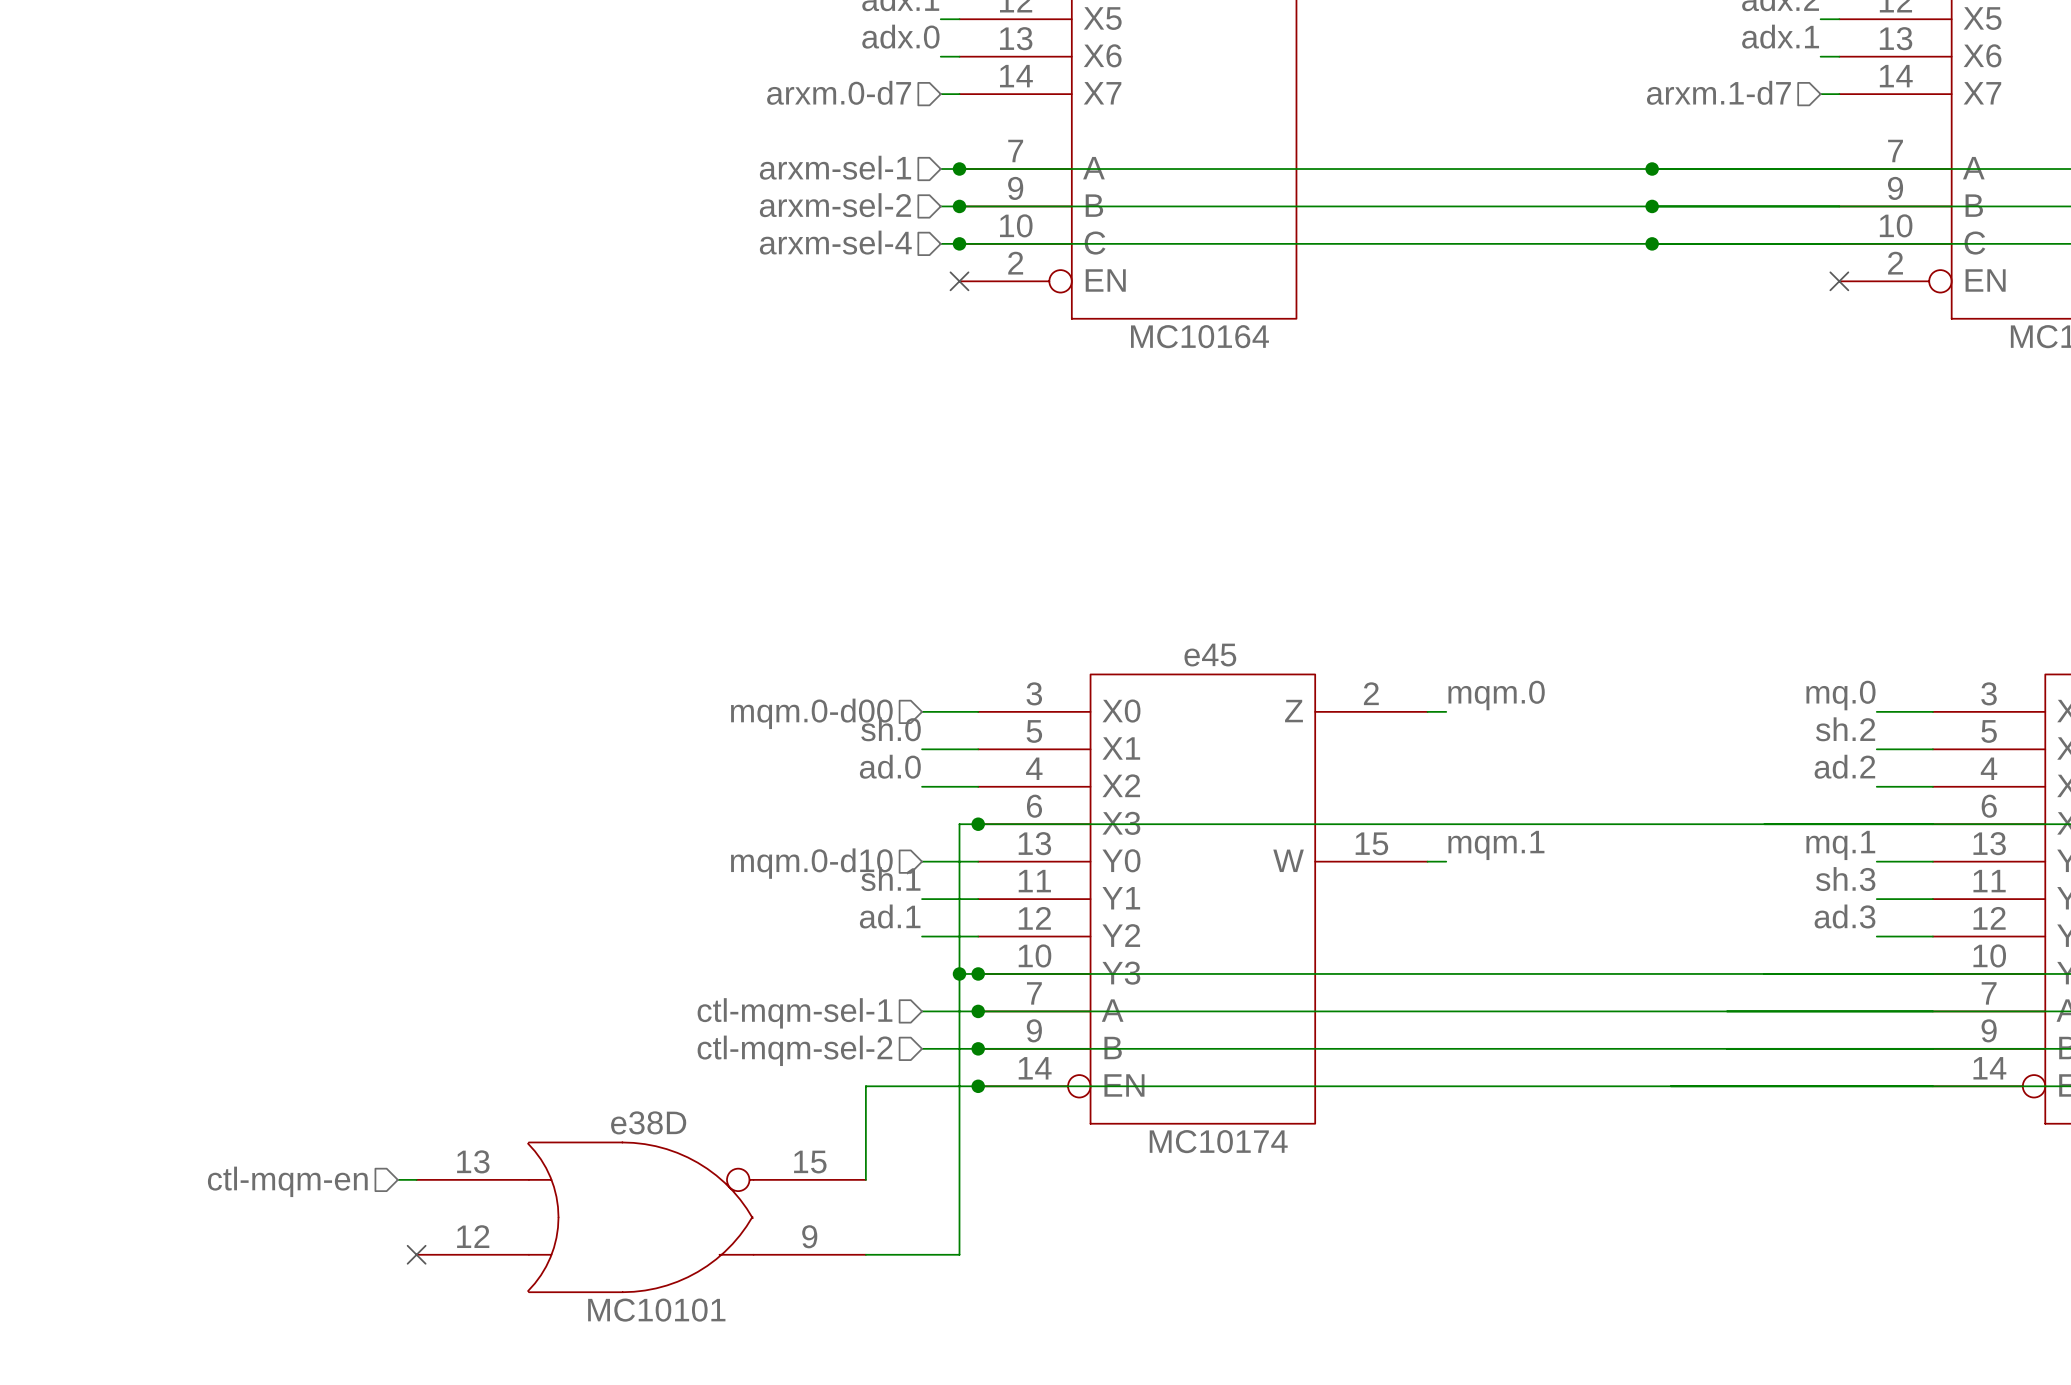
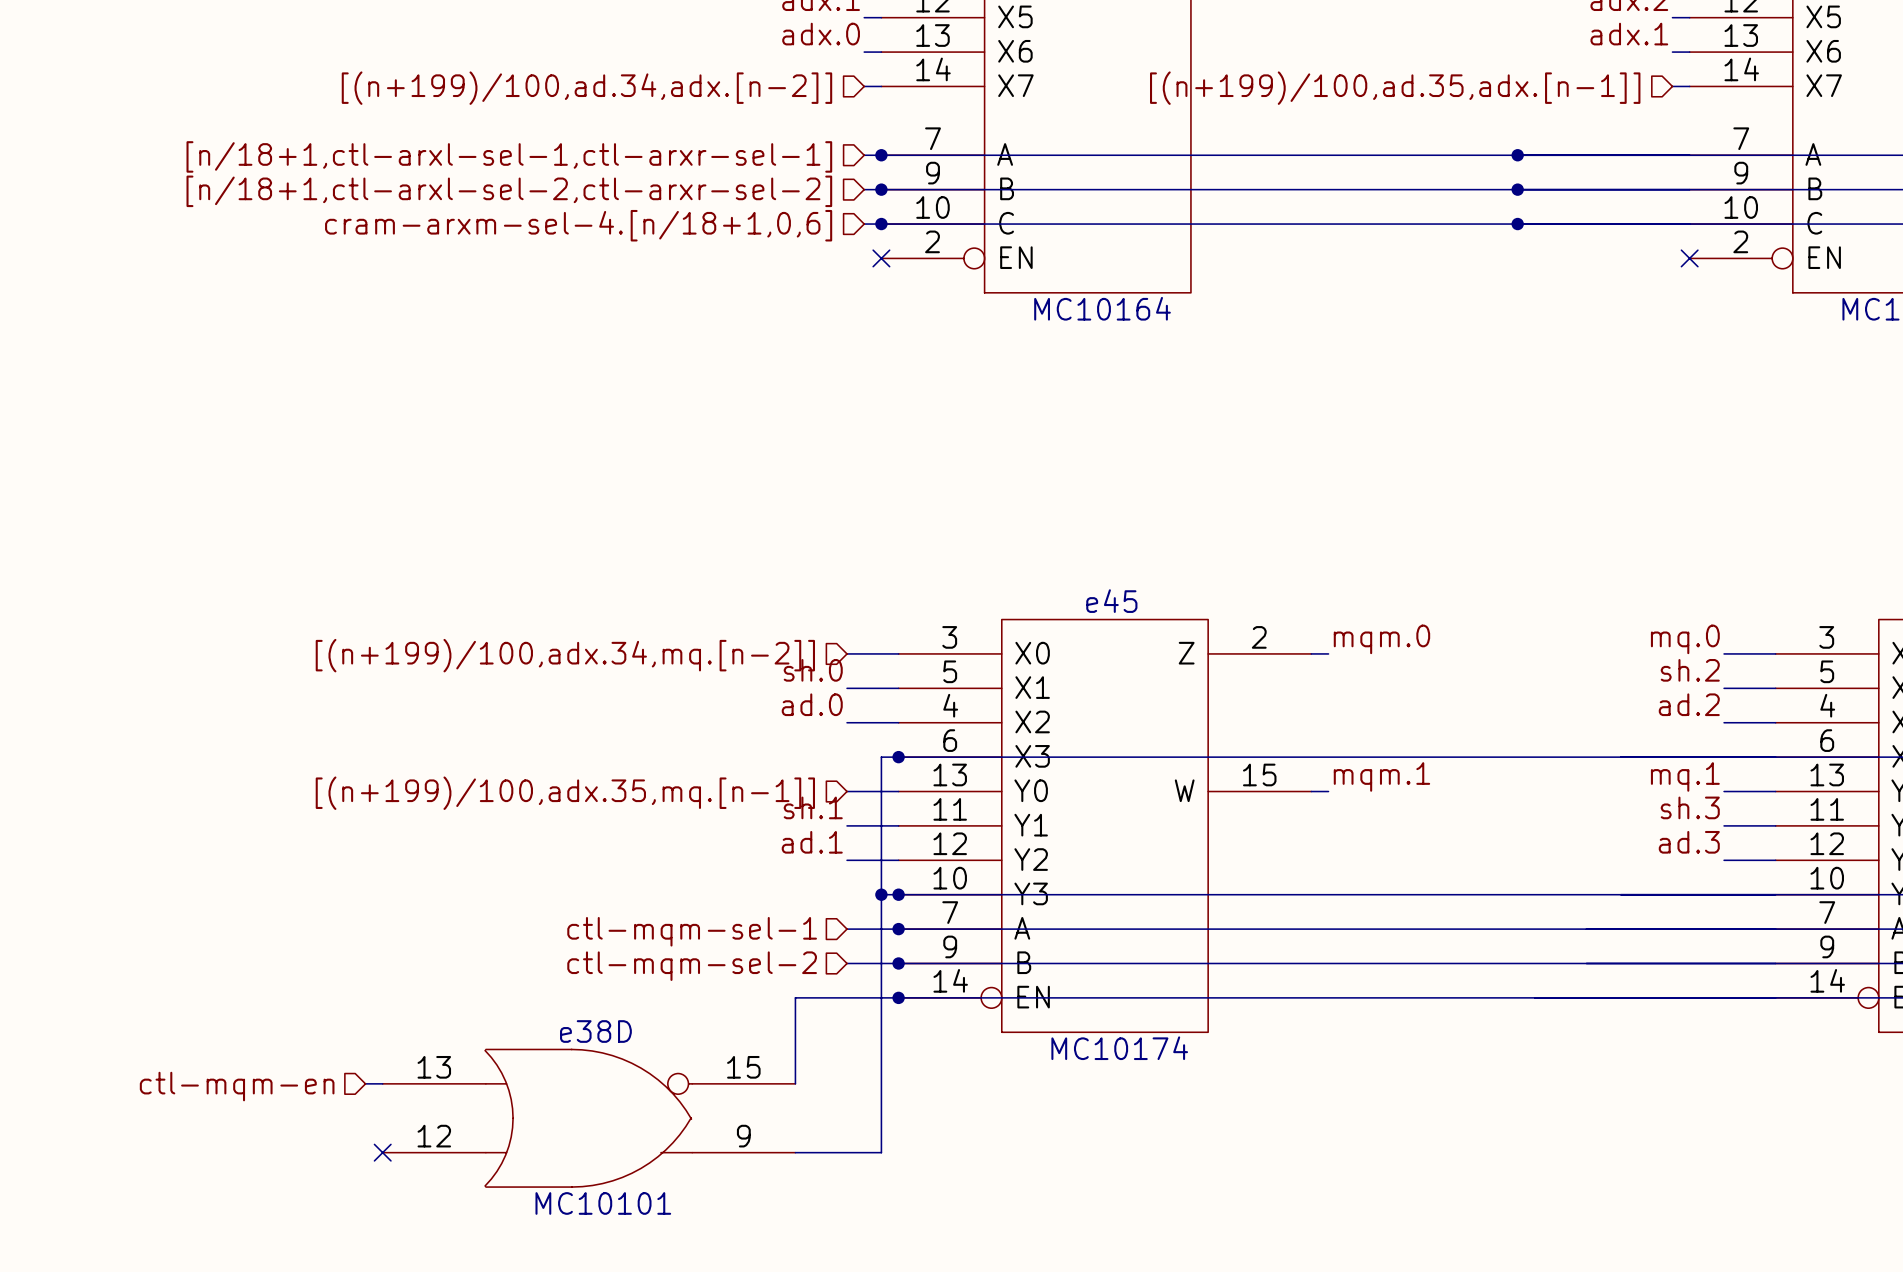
hierarchical label: arxm.0-d7 (839, 92) -> [(n+199)/100,ad.34,adx.[n-2]] (586, 88)
hierarchical label: arxm.1-d7 (1718, 92) -> [(n+199)/100,ad.35,adx.[n-1]] (1395, 88)
hierarchical label: arxm-sel-1 (835, 167) -> [n/18+1,ctl-arxl-sel-1,ctl-arxr-sel-1] (509, 156)
hierarchical label: arxm-sel-2 (835, 205) -> [n/18+1,ctl-arxl-sel-2,ctl-arxr-sel-2] (509, 191)
hierarchical label: arxm-sel-4 (835, 242) -> cram-arxm-sel-4.[n/18+1,0,6] (578, 225)
hierarchical label: mqm.0-d00 (811, 713) -> [(n+199)/100,adx.34,mq.[n-2]] (565, 655)
hierarchical label: mqm.0-d10 (811, 863) -> [(n+199)/100,adx.35,mq.[n-1]] (565, 793)

